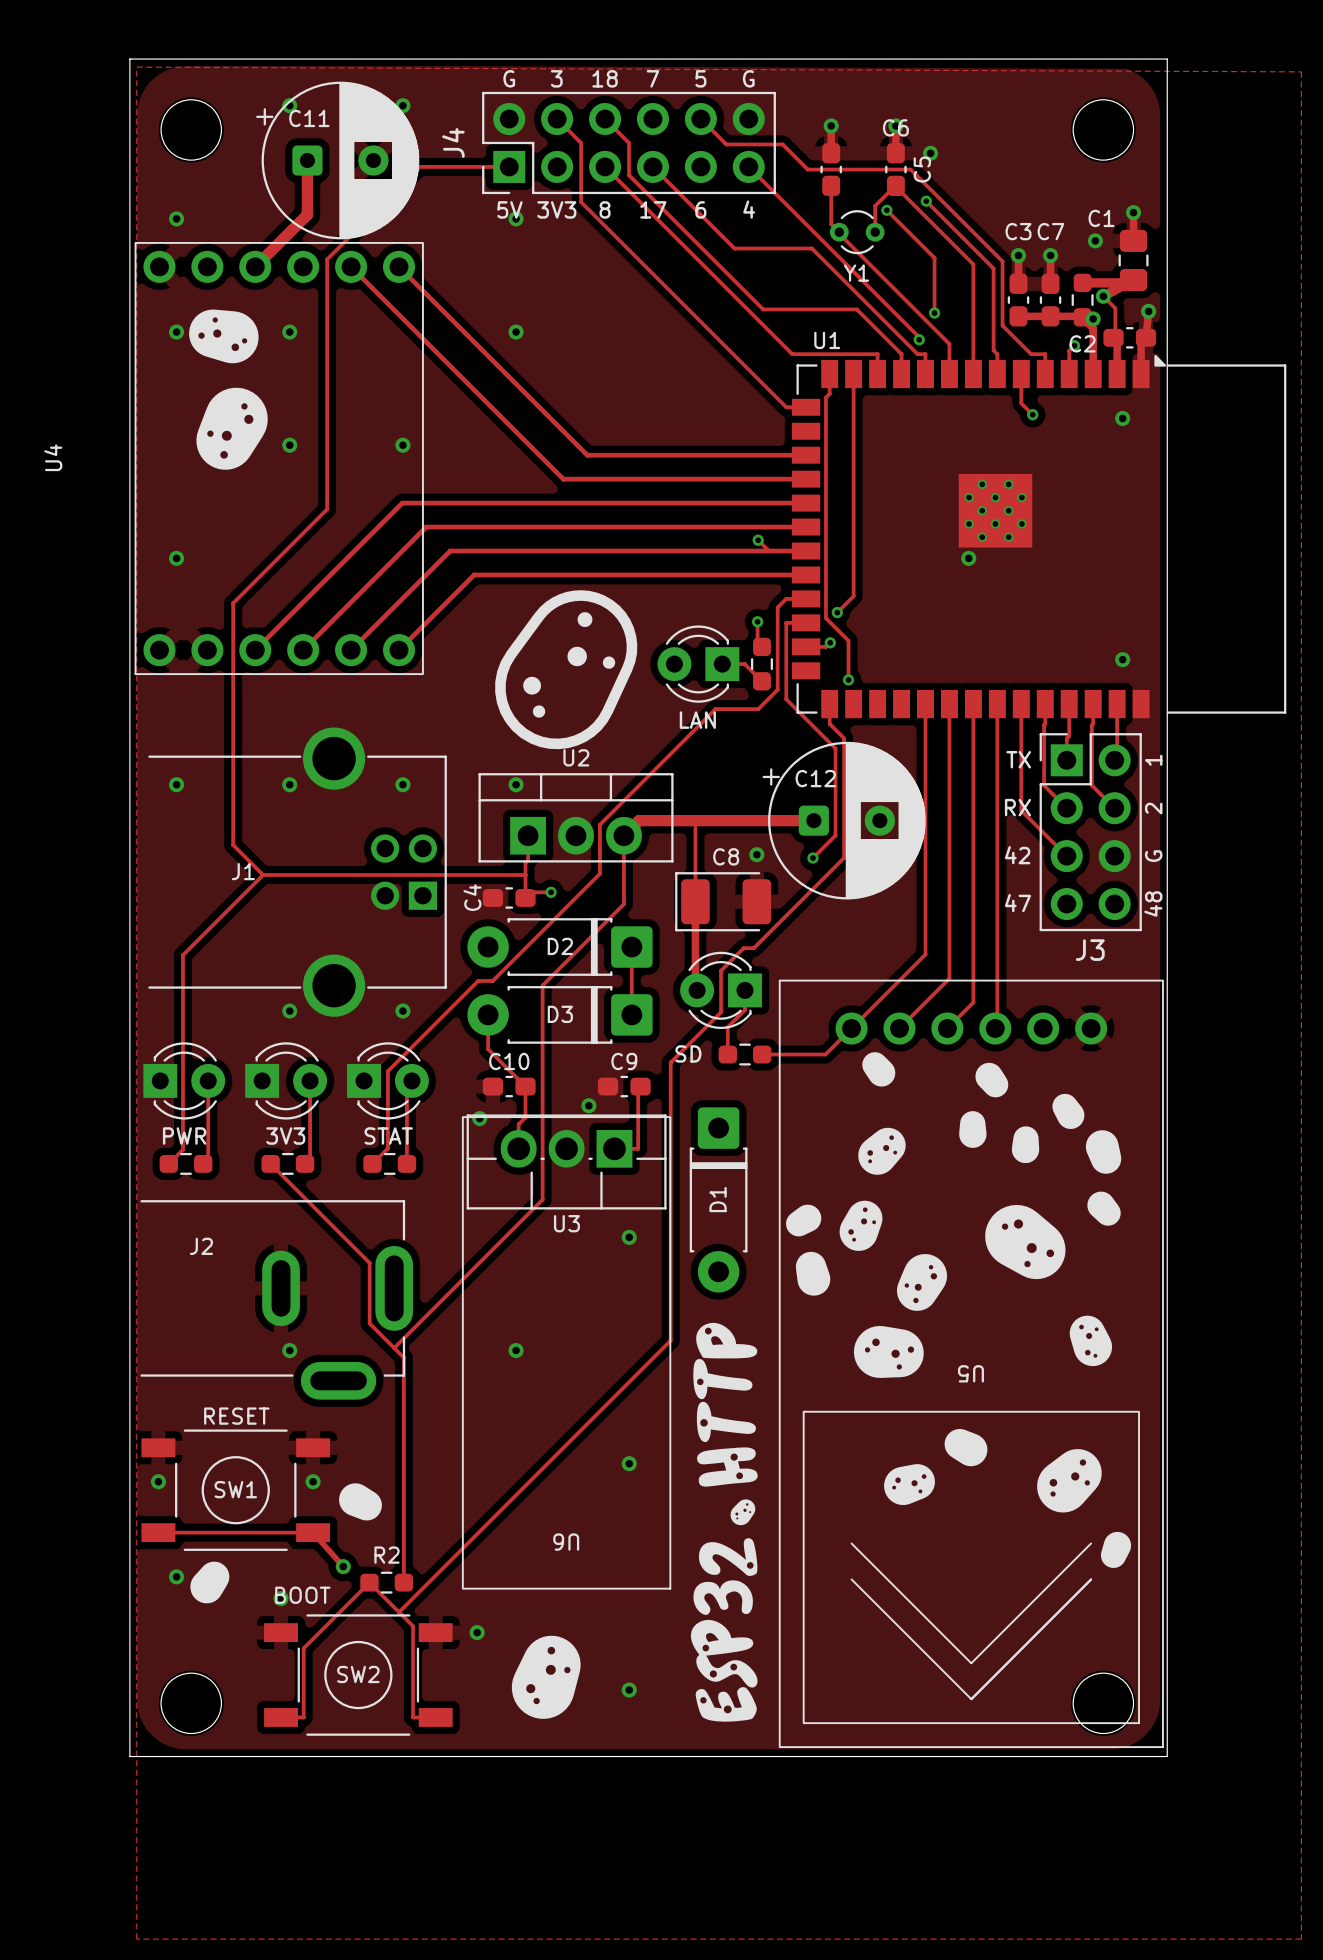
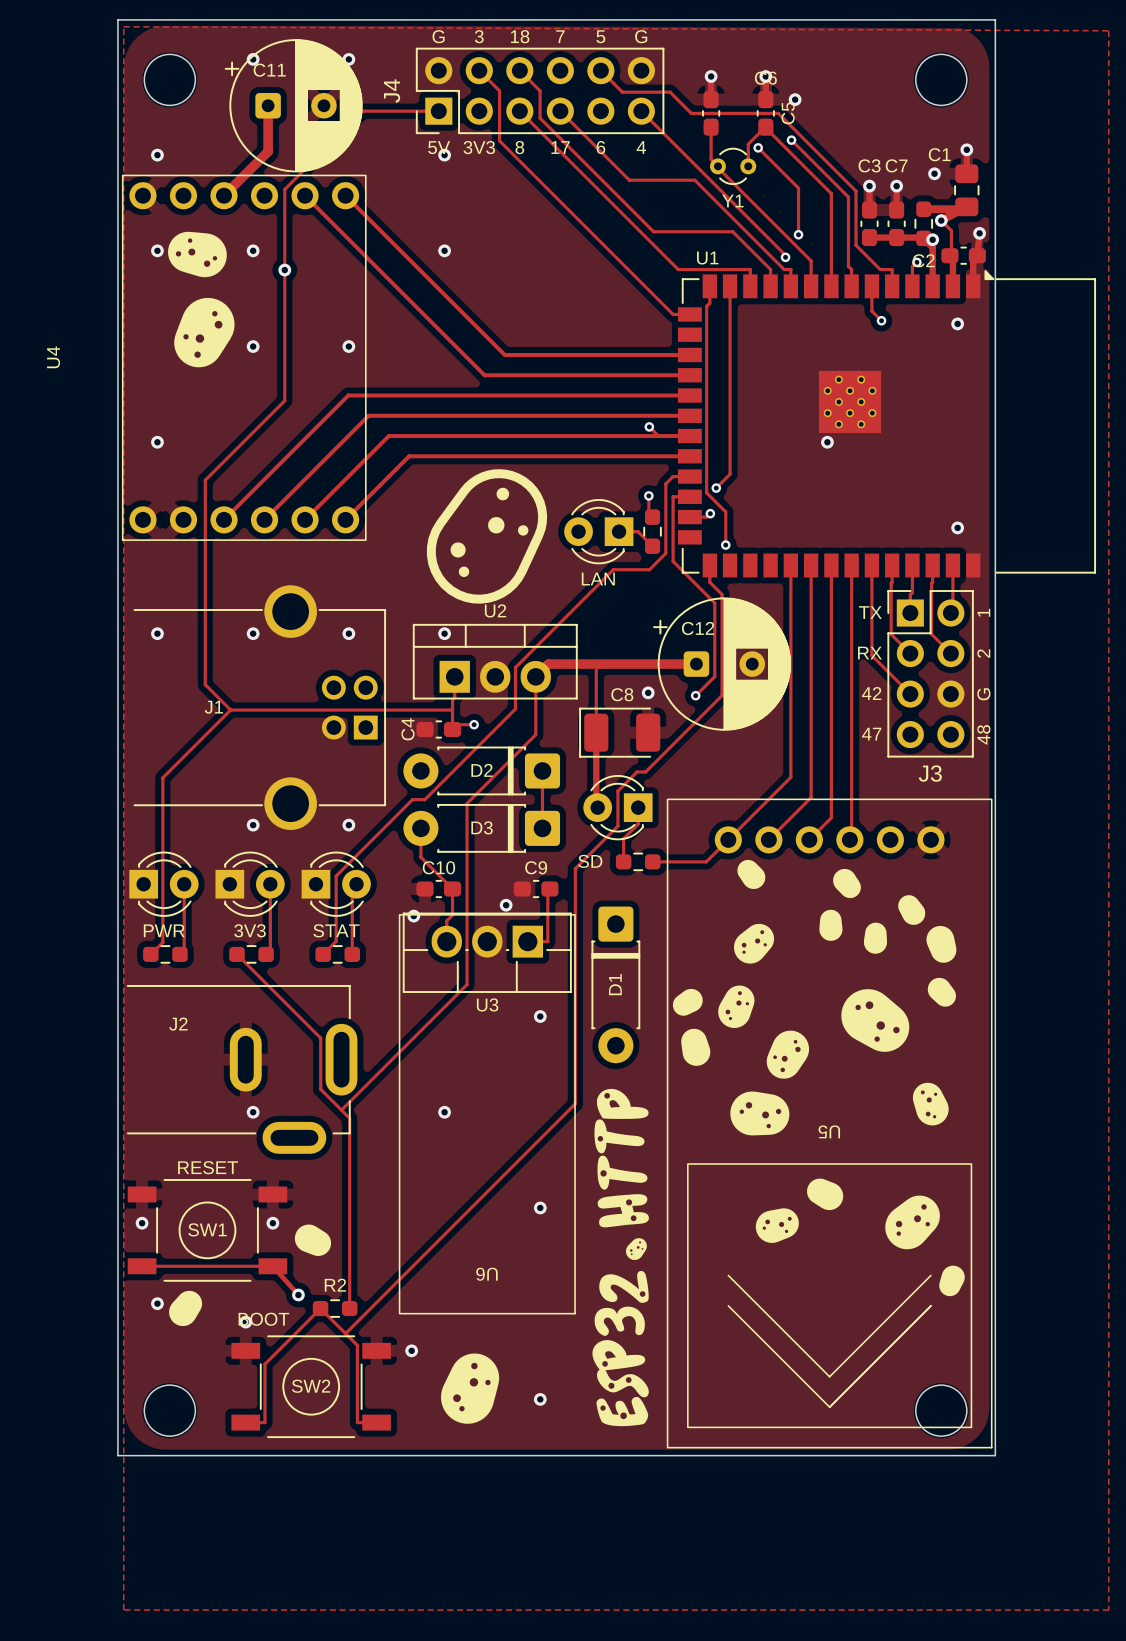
via: none -> (284, 270)

